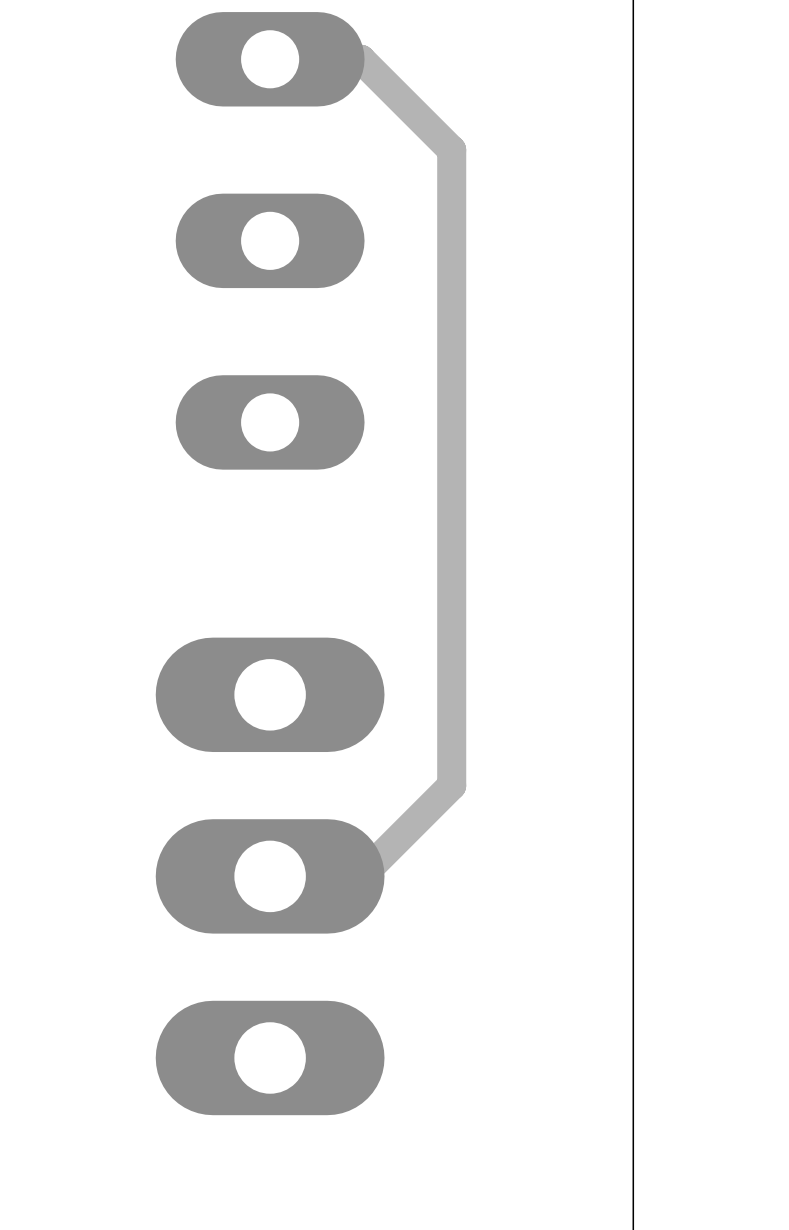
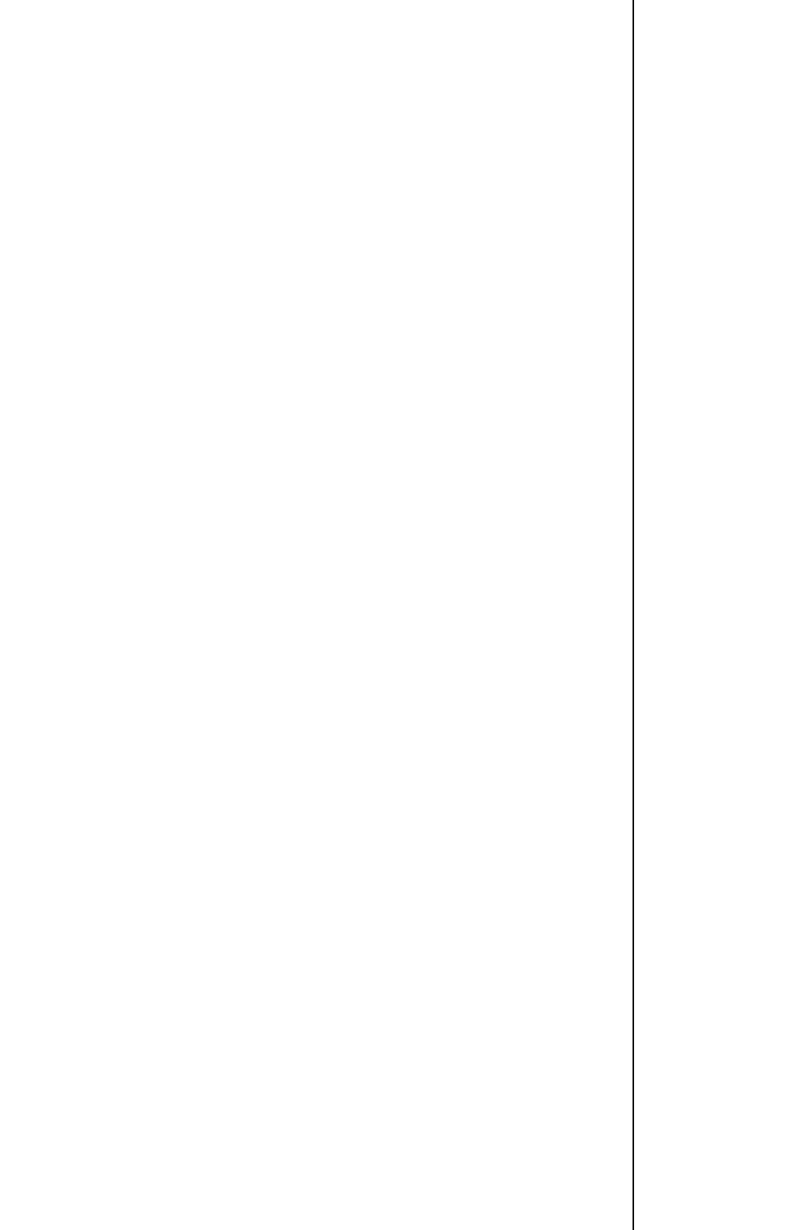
track: (270, 59) (360, 59) (451, 150) (451, 785) (360, 876) (270, 876) -> none
part: (270, 240) -> none
part: (270, 876) -> none

